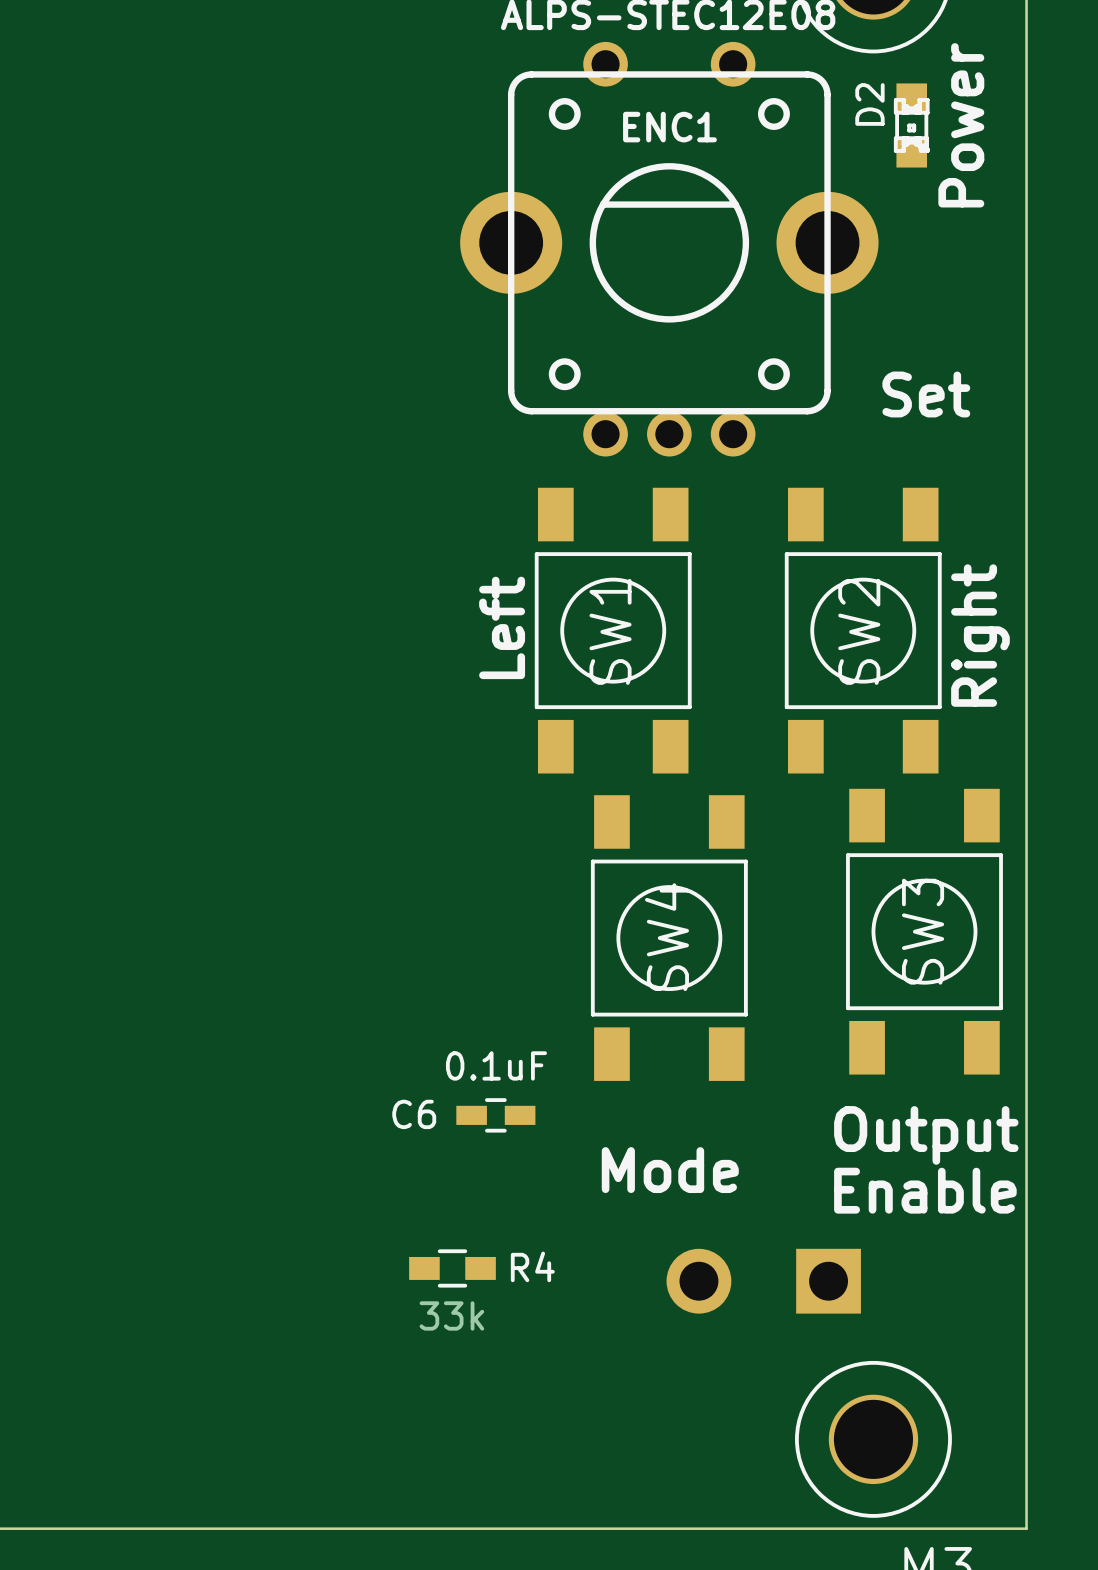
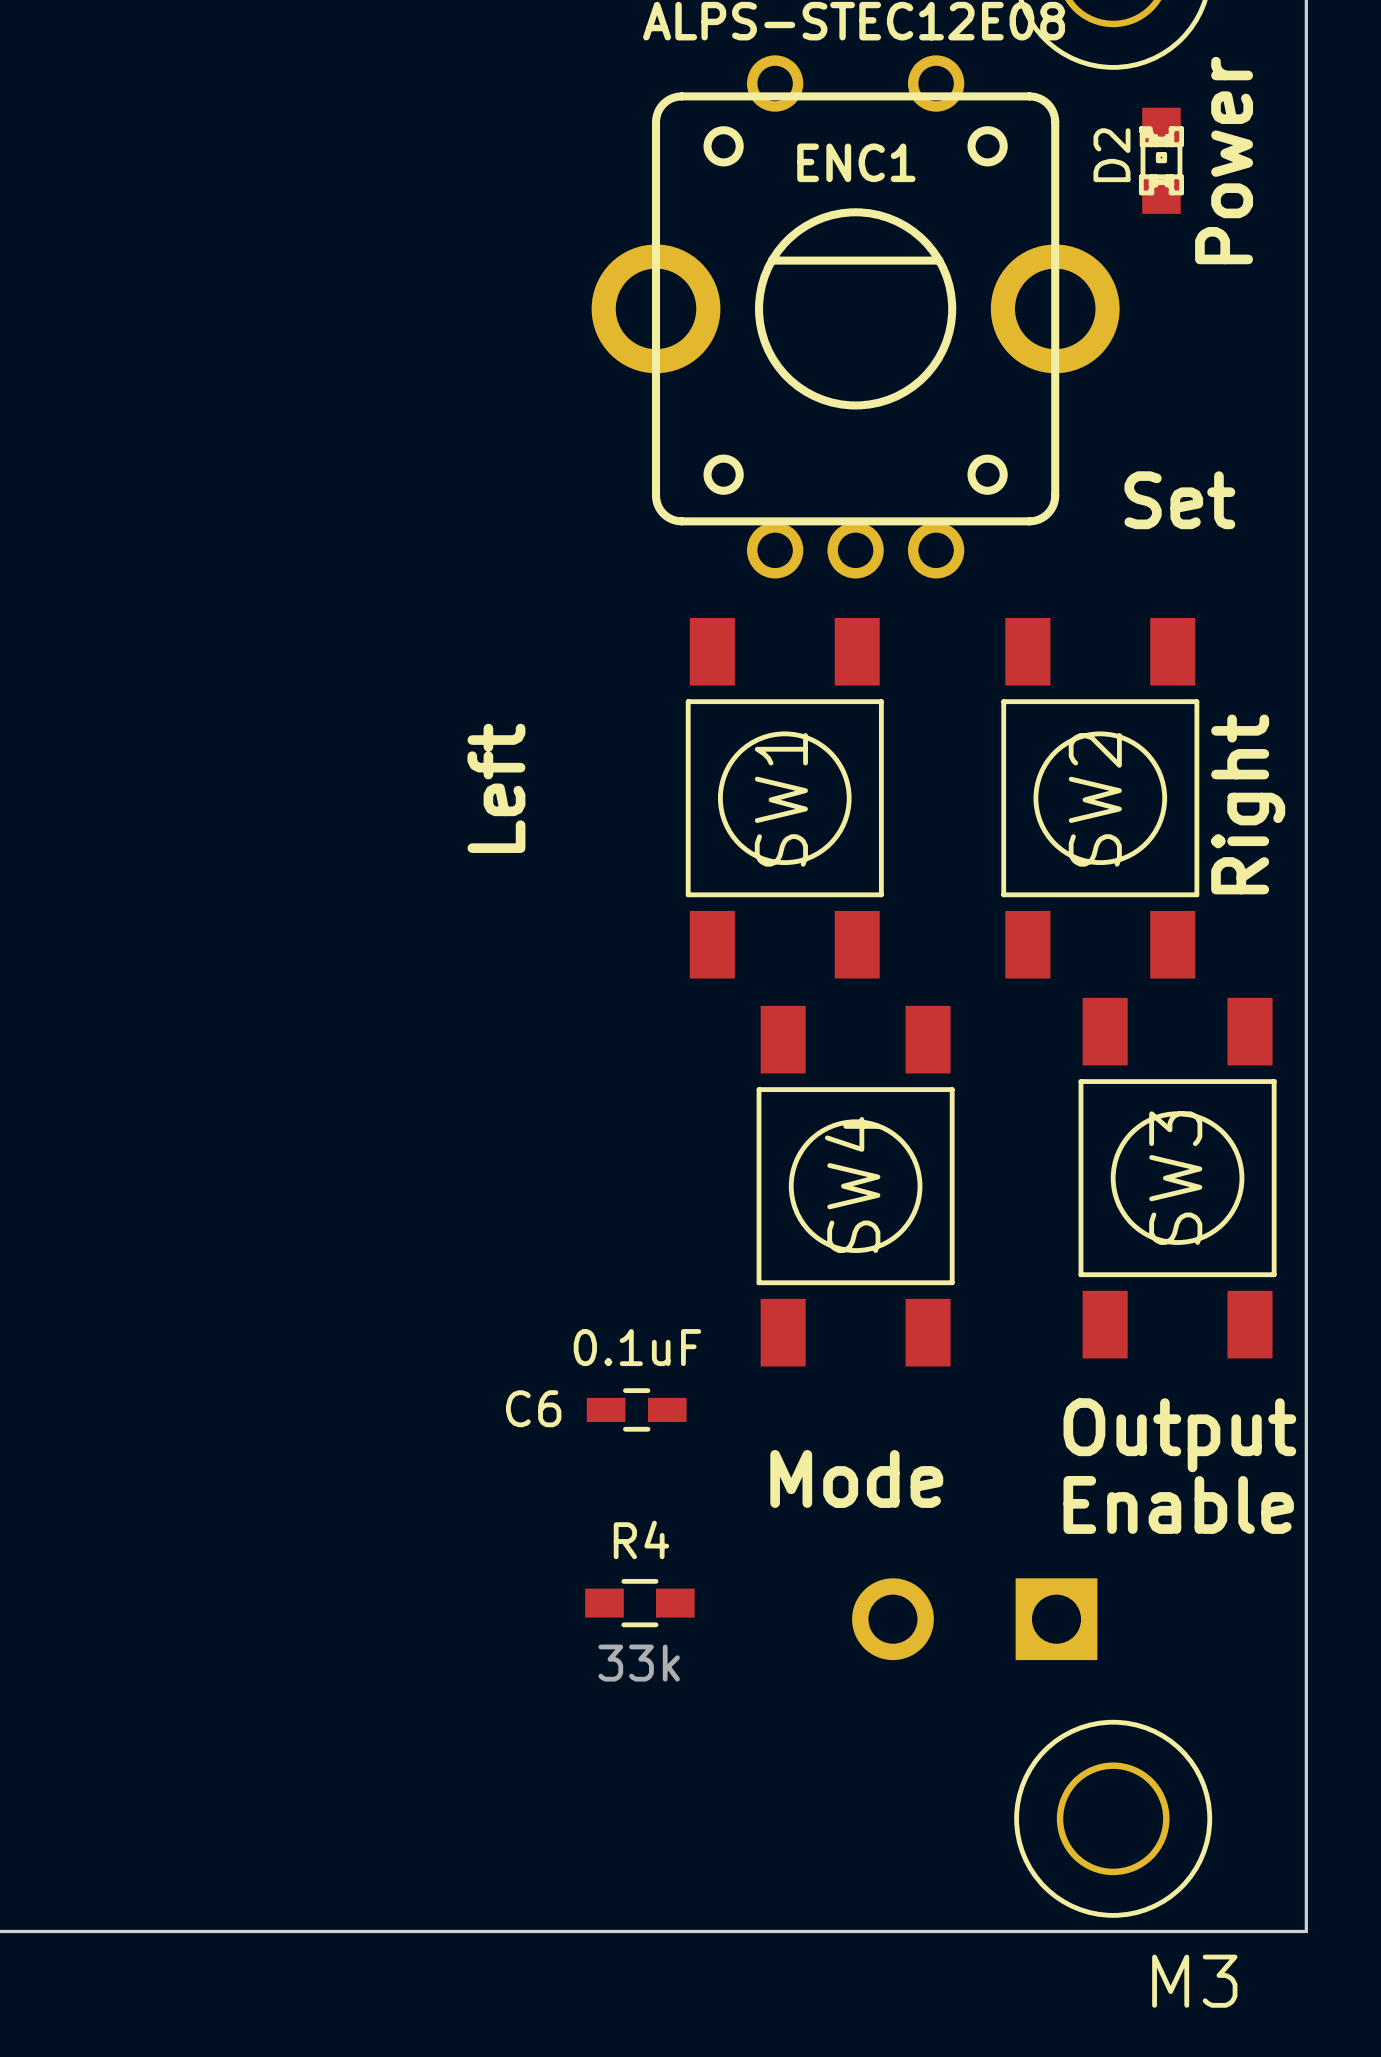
D2 rotation: 0° (911, 125) -> 180° (1161, 160)
text position: Left (502, 627) -> Left (496, 788)
R4 name position: R4 (532, 1266) -> R4 (641, 1539)
R4 position: (452, 1268) -> (639, 1603)

